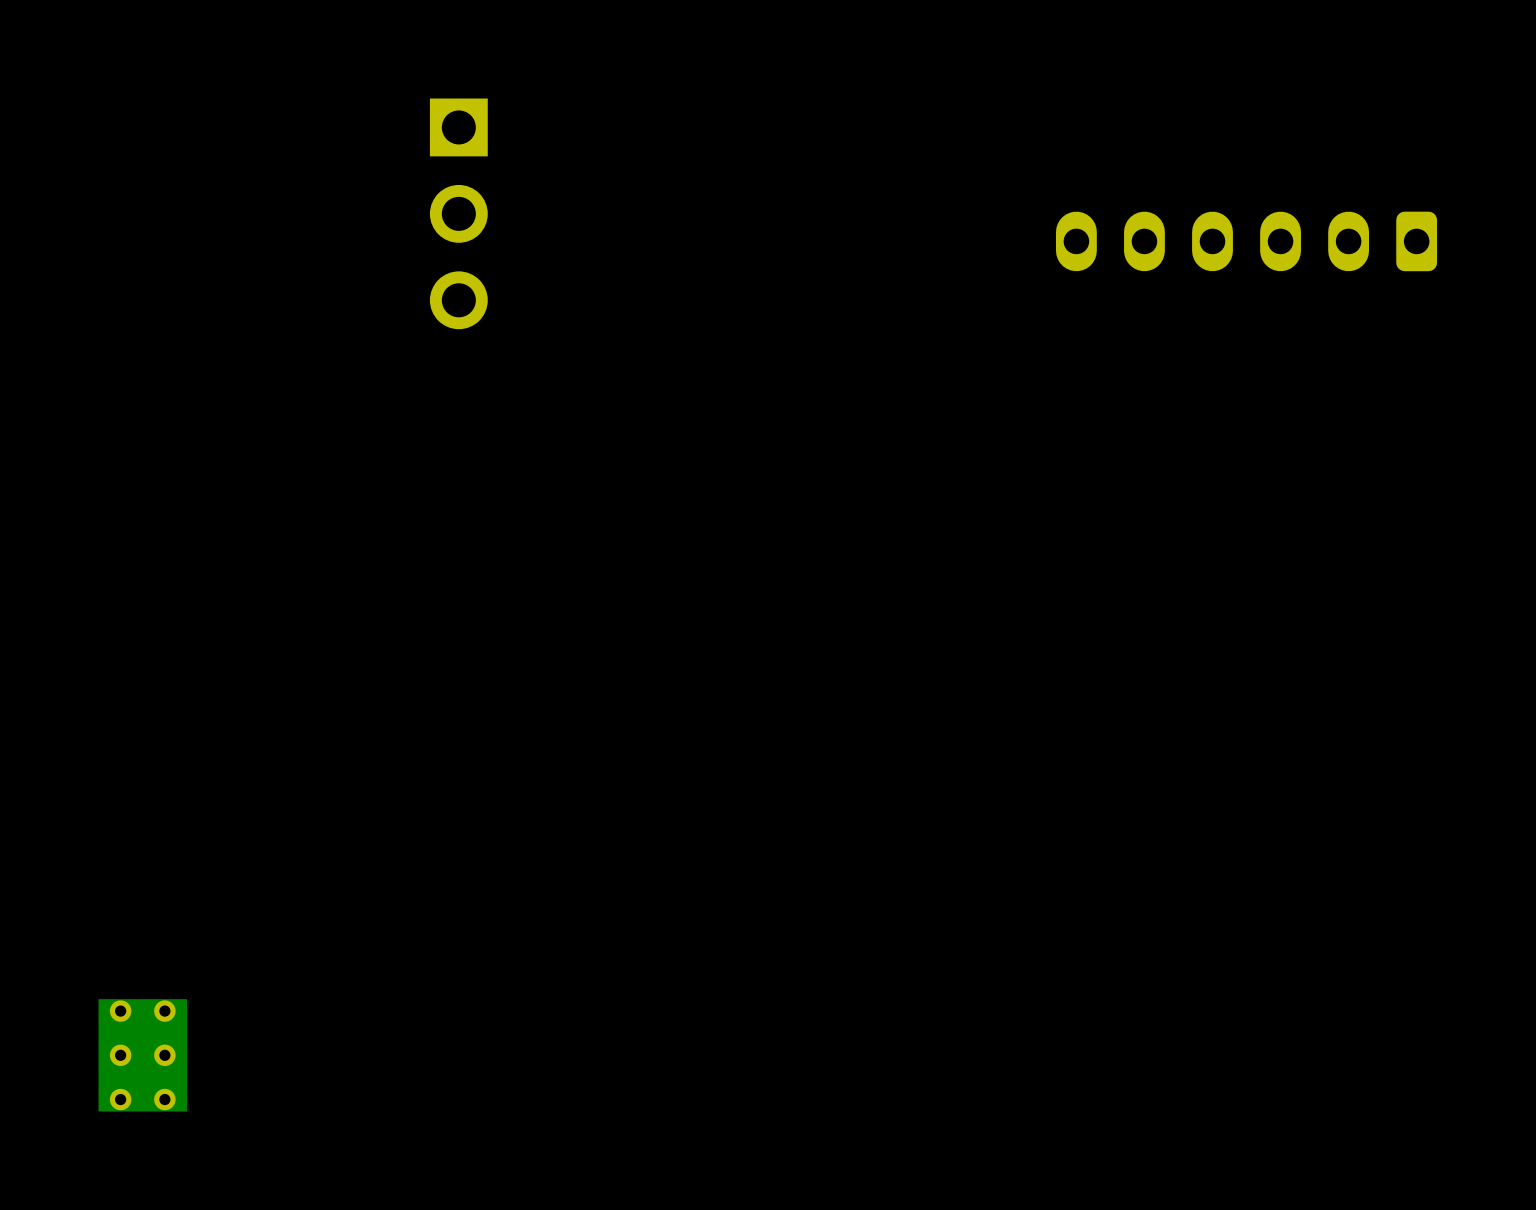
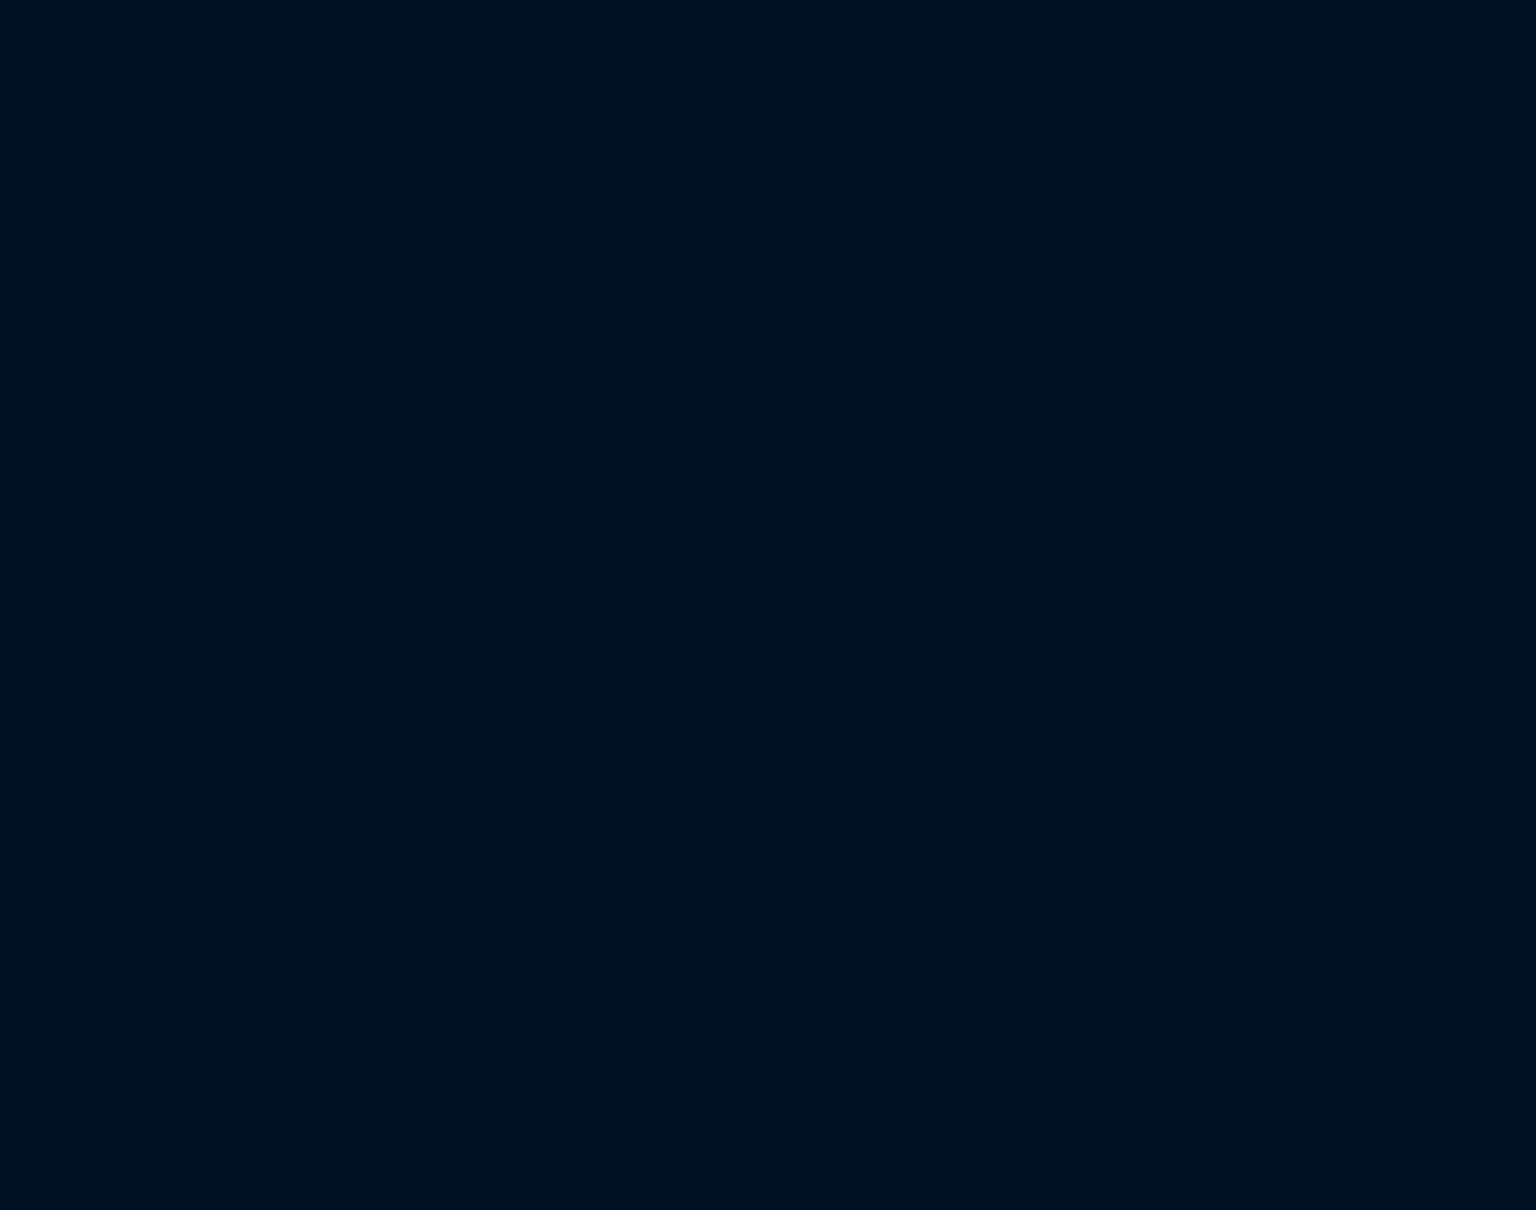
part: (458, 213) -> none
part: (1246, 241) -> none
part: (142, 1055) -> none

